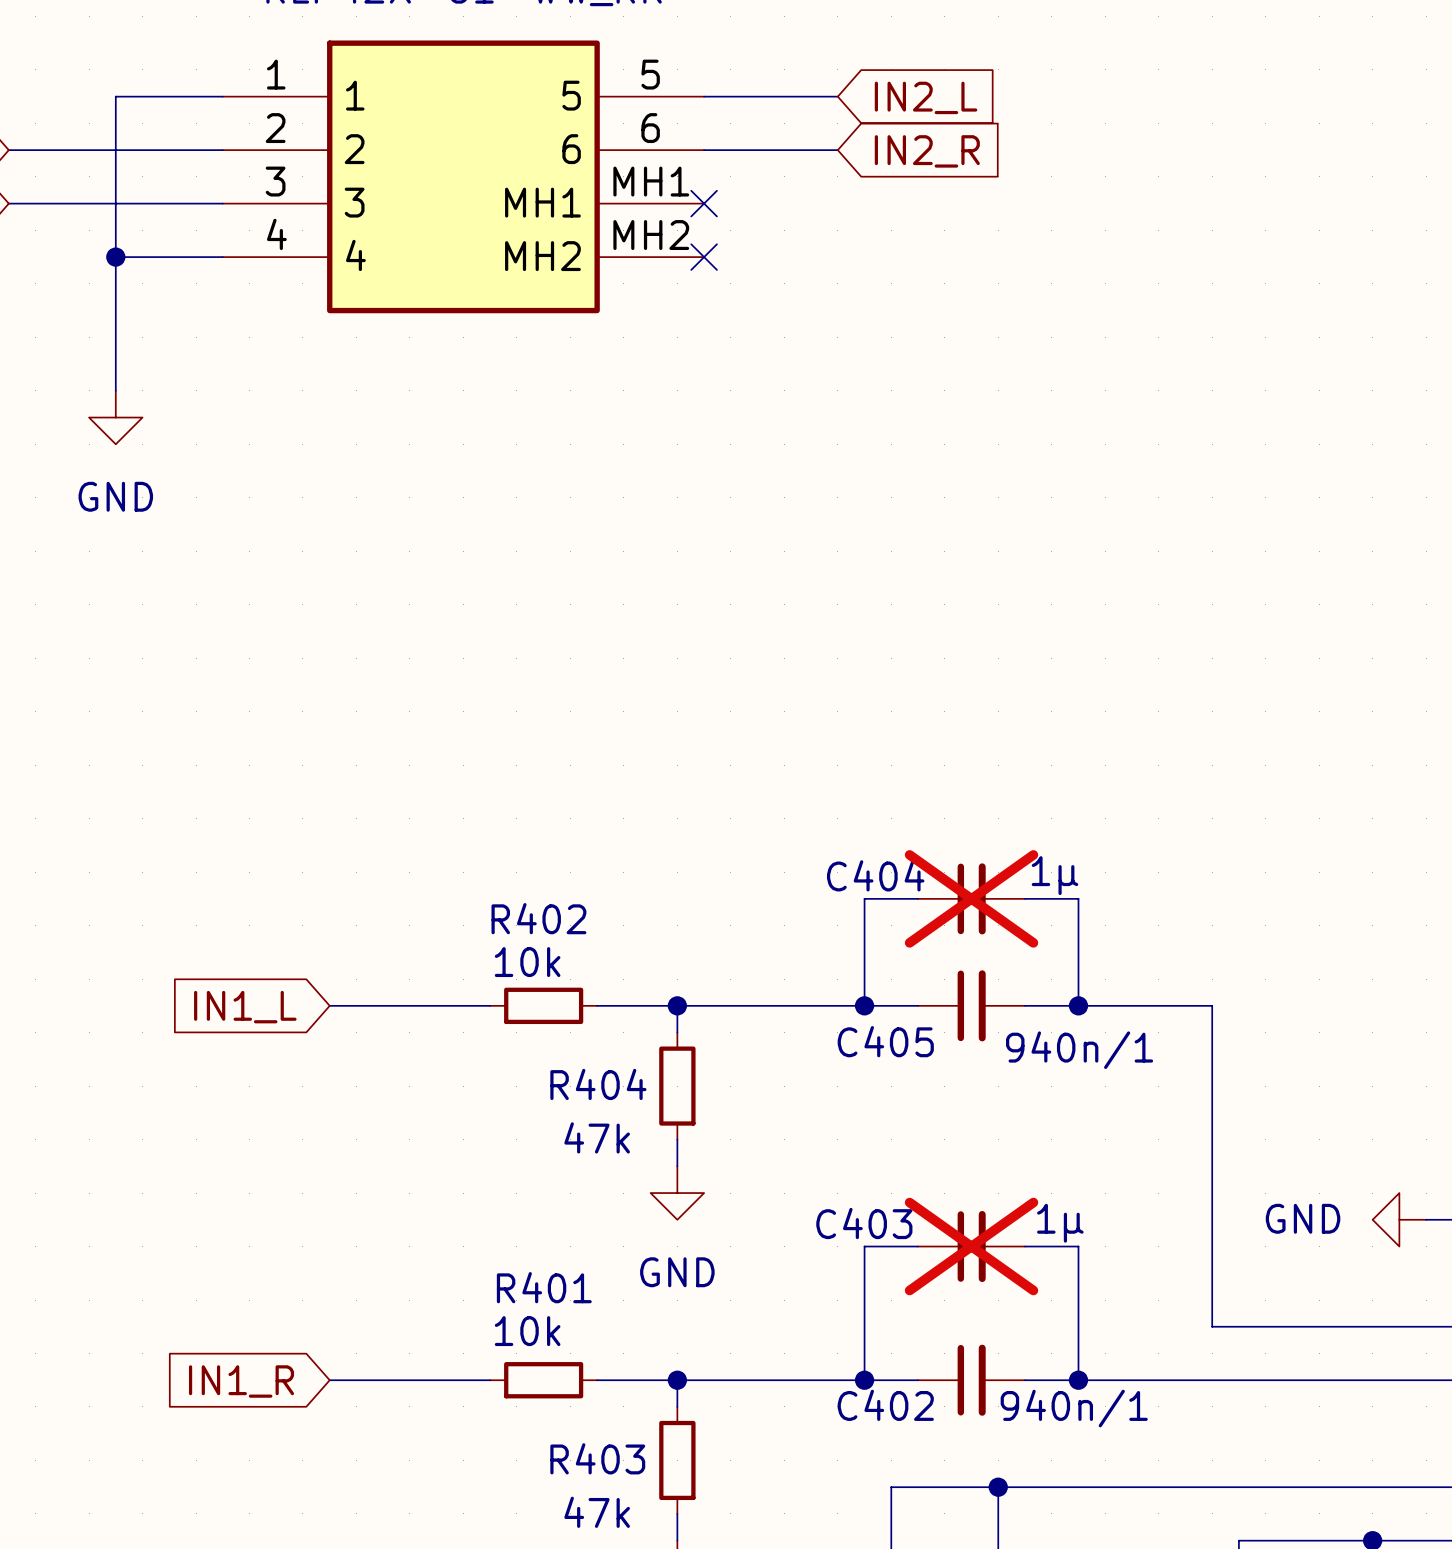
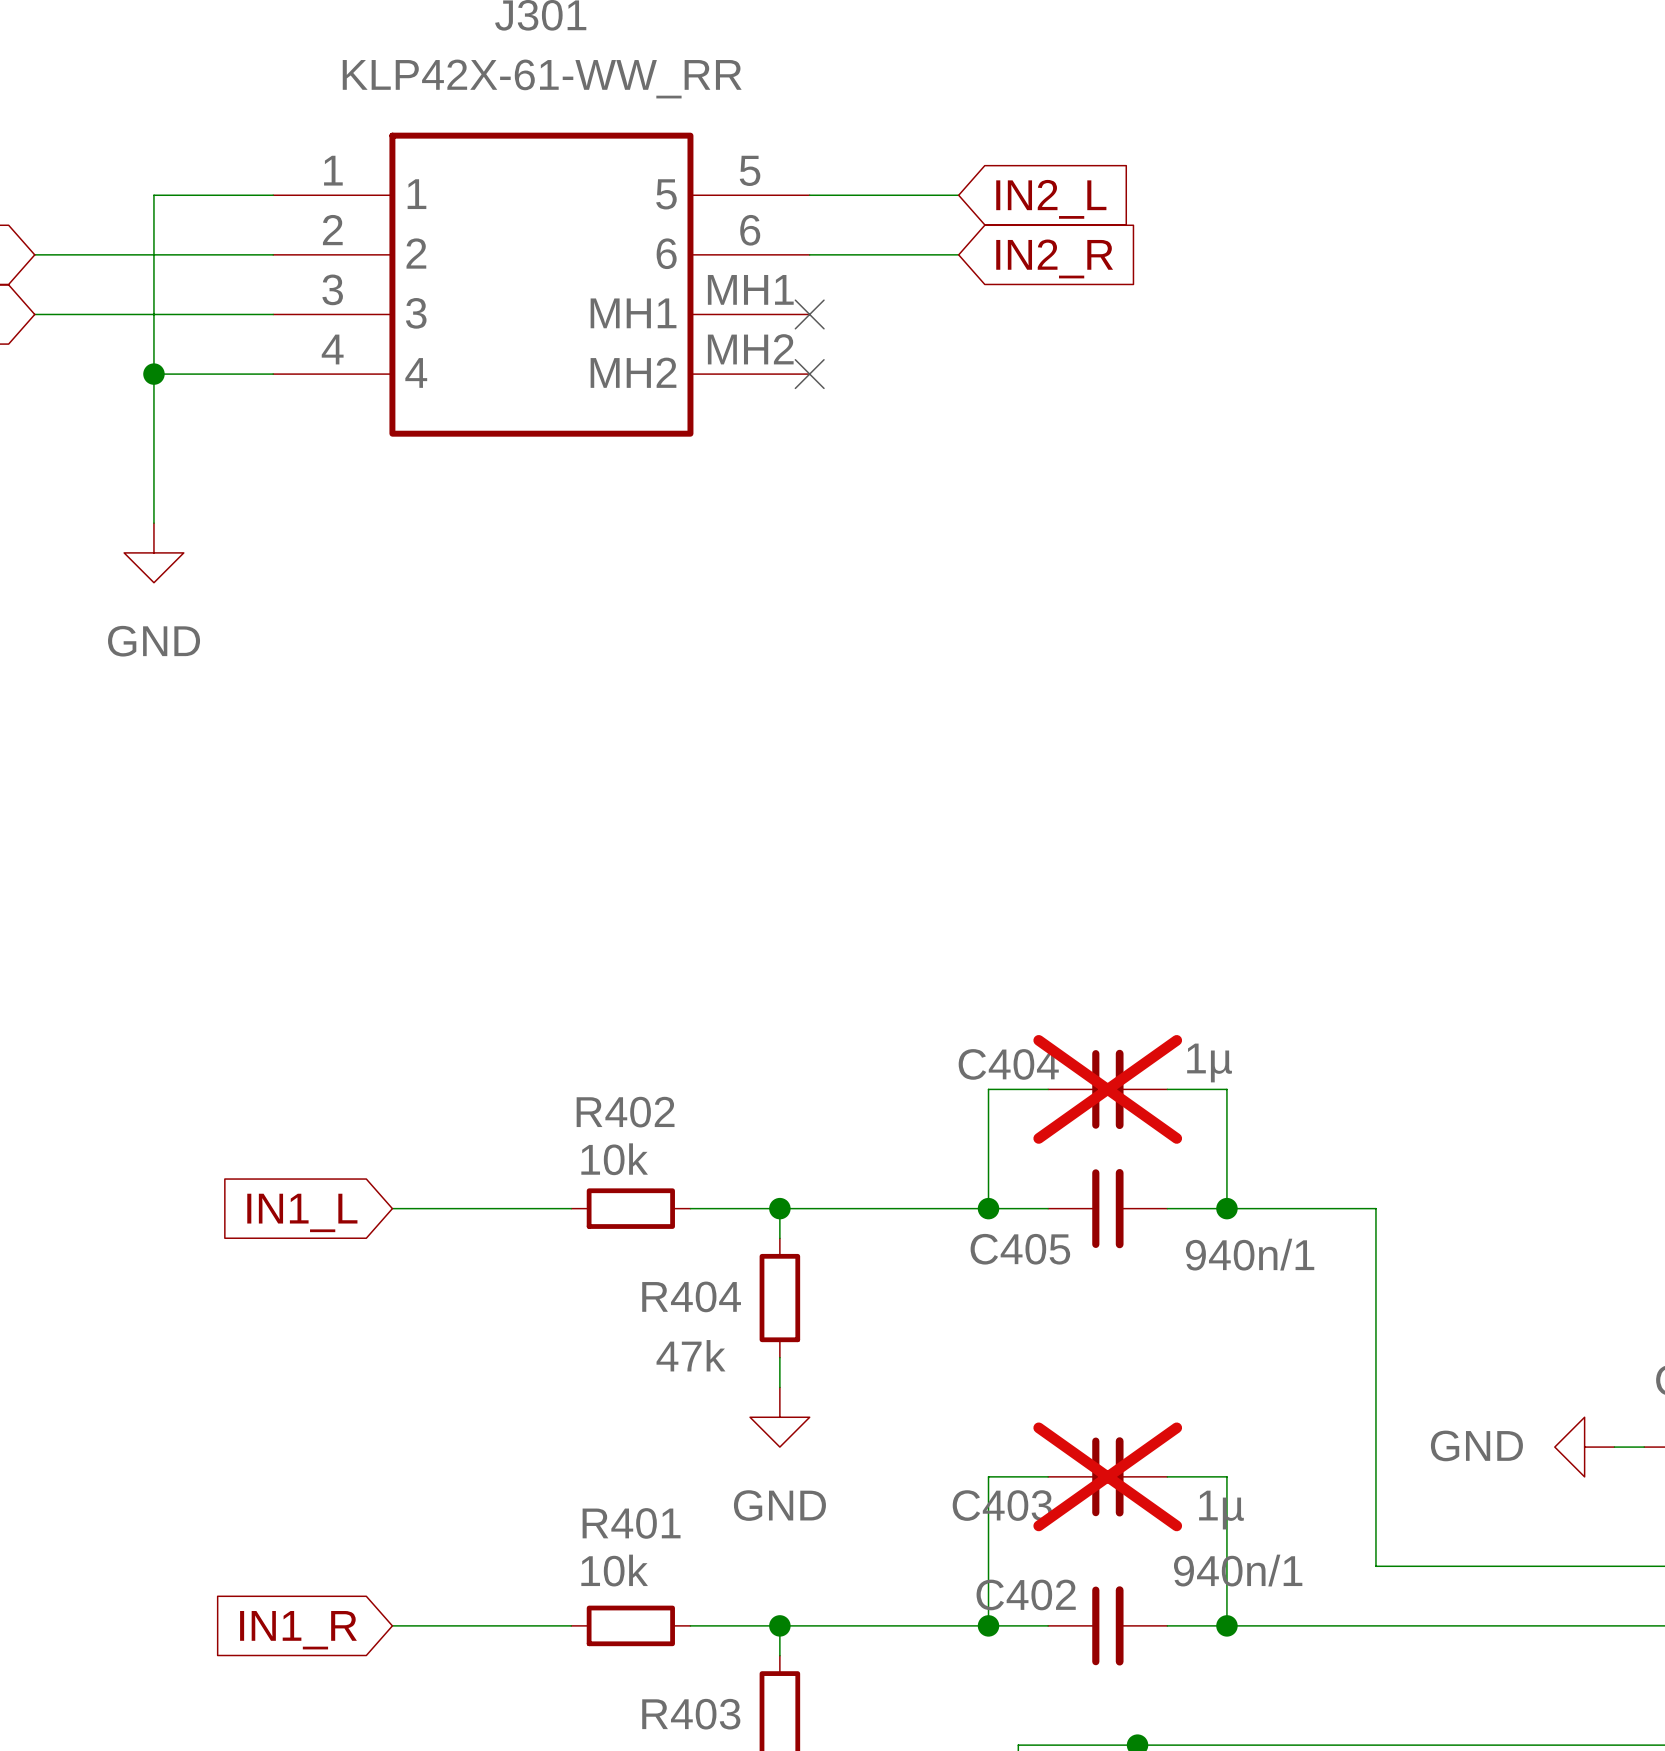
C403 name position: C403 (864, 1223) -> C403 (1002, 1505)
C403 value position: 1µ (1060, 1223) -> 1µ (1221, 1510)
C402 name position: C402 (885, 1405) -> C402 (1026, 1594)
C402 value position: 940n/1 (1074, 1408) -> 940n/1 (1238, 1570)

